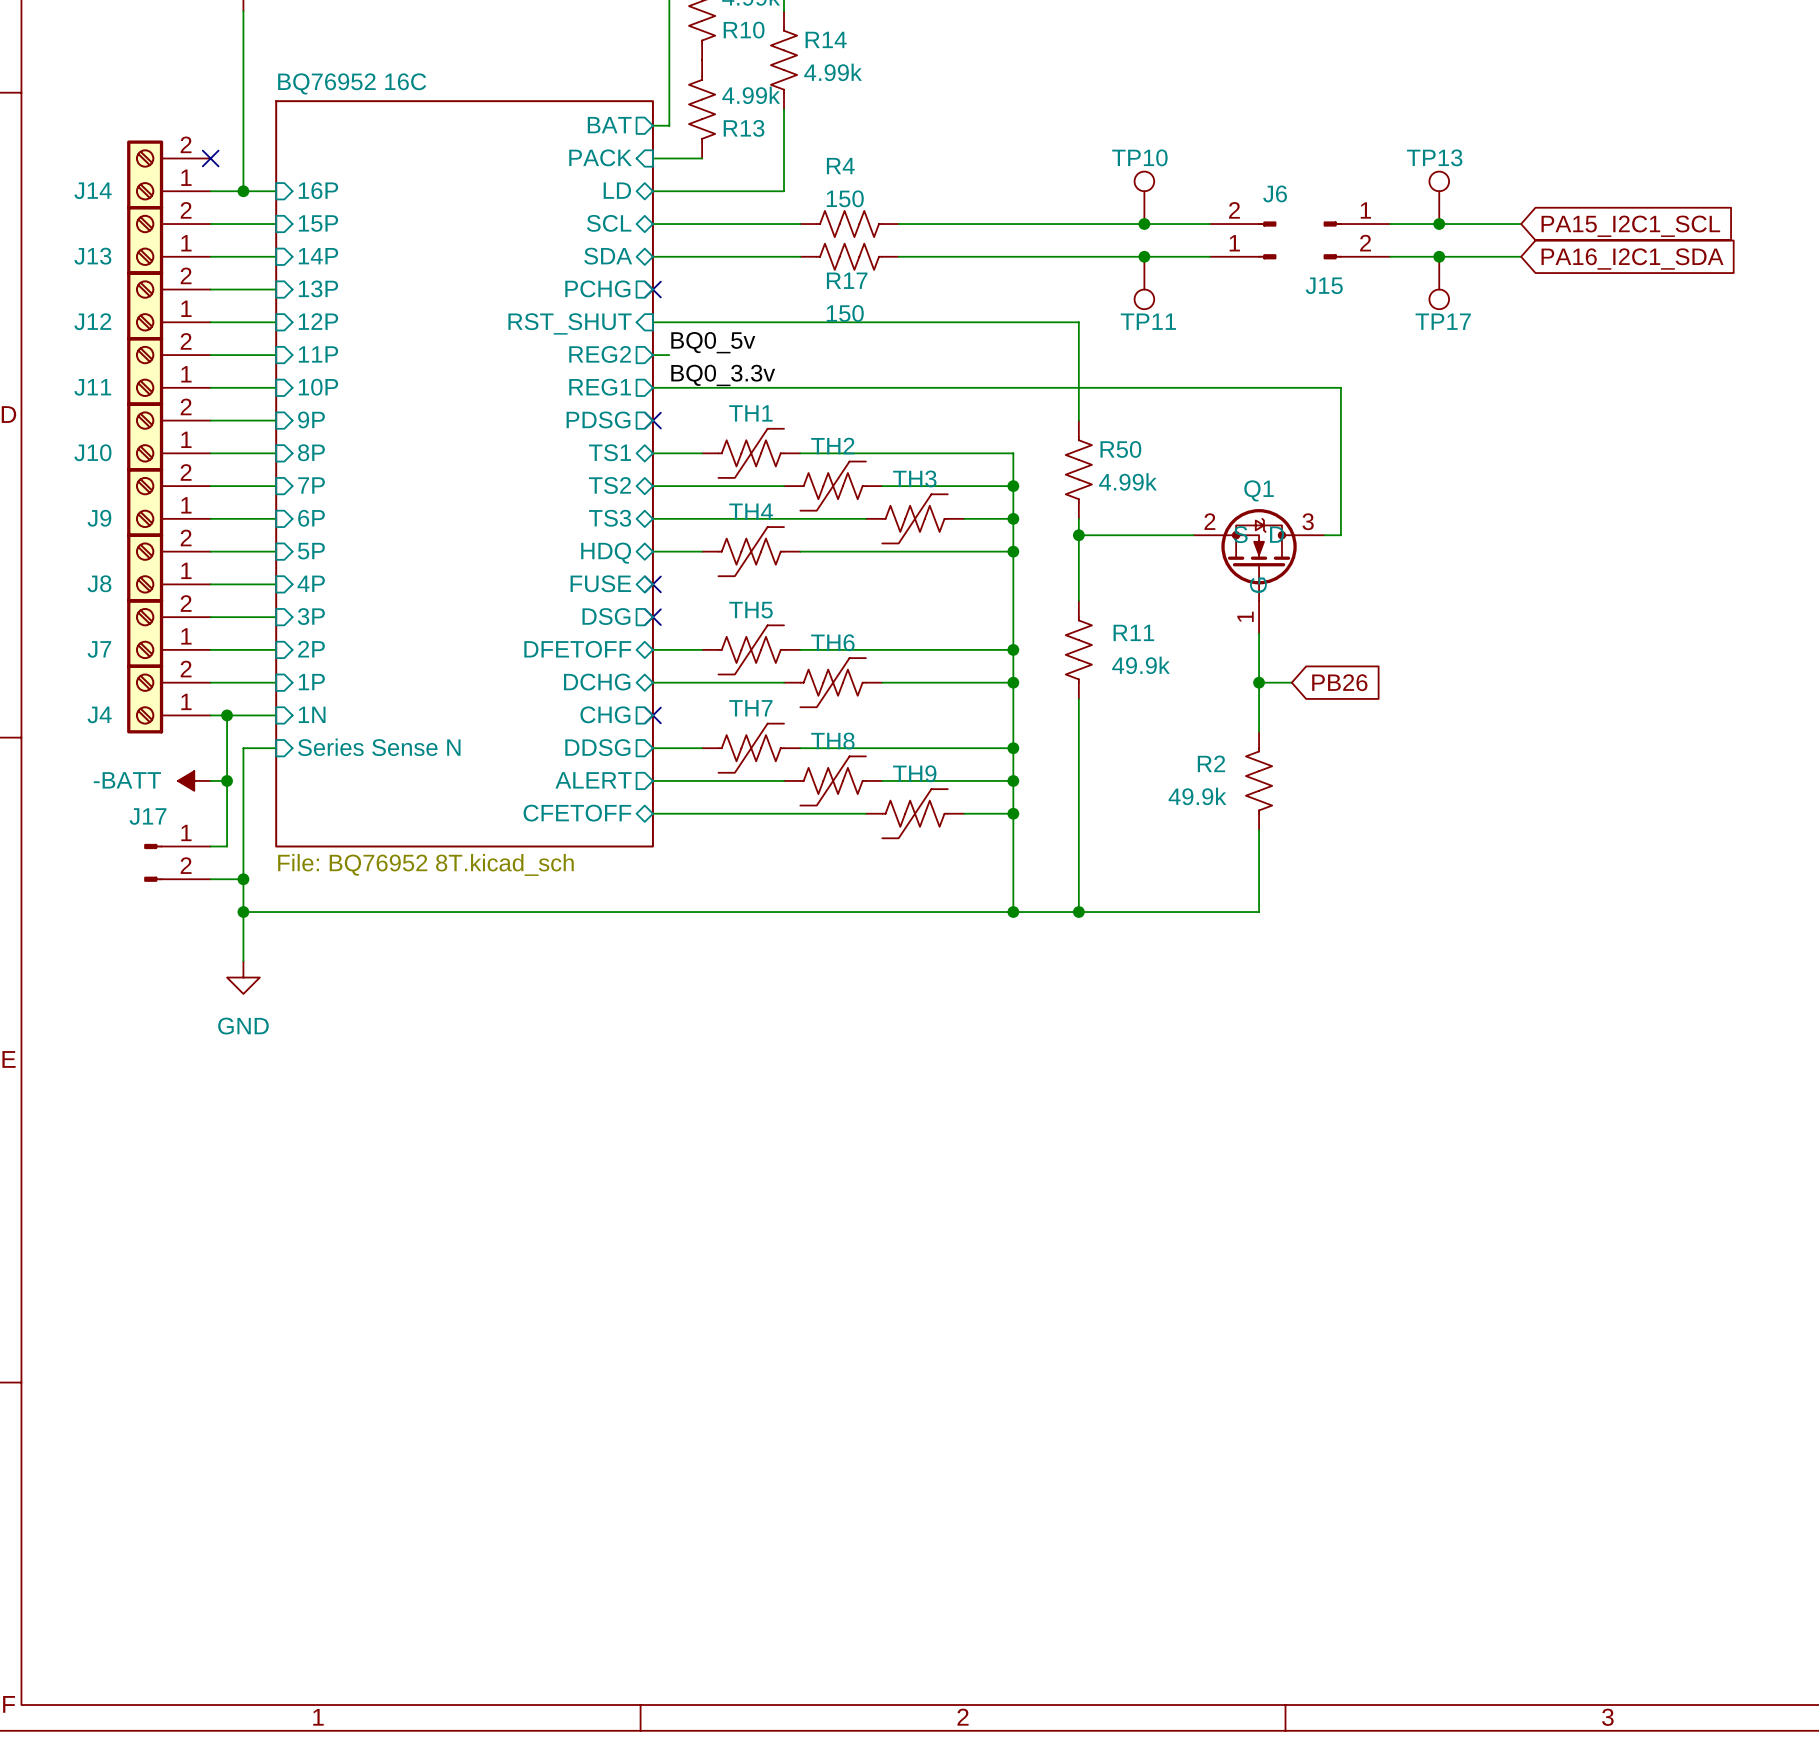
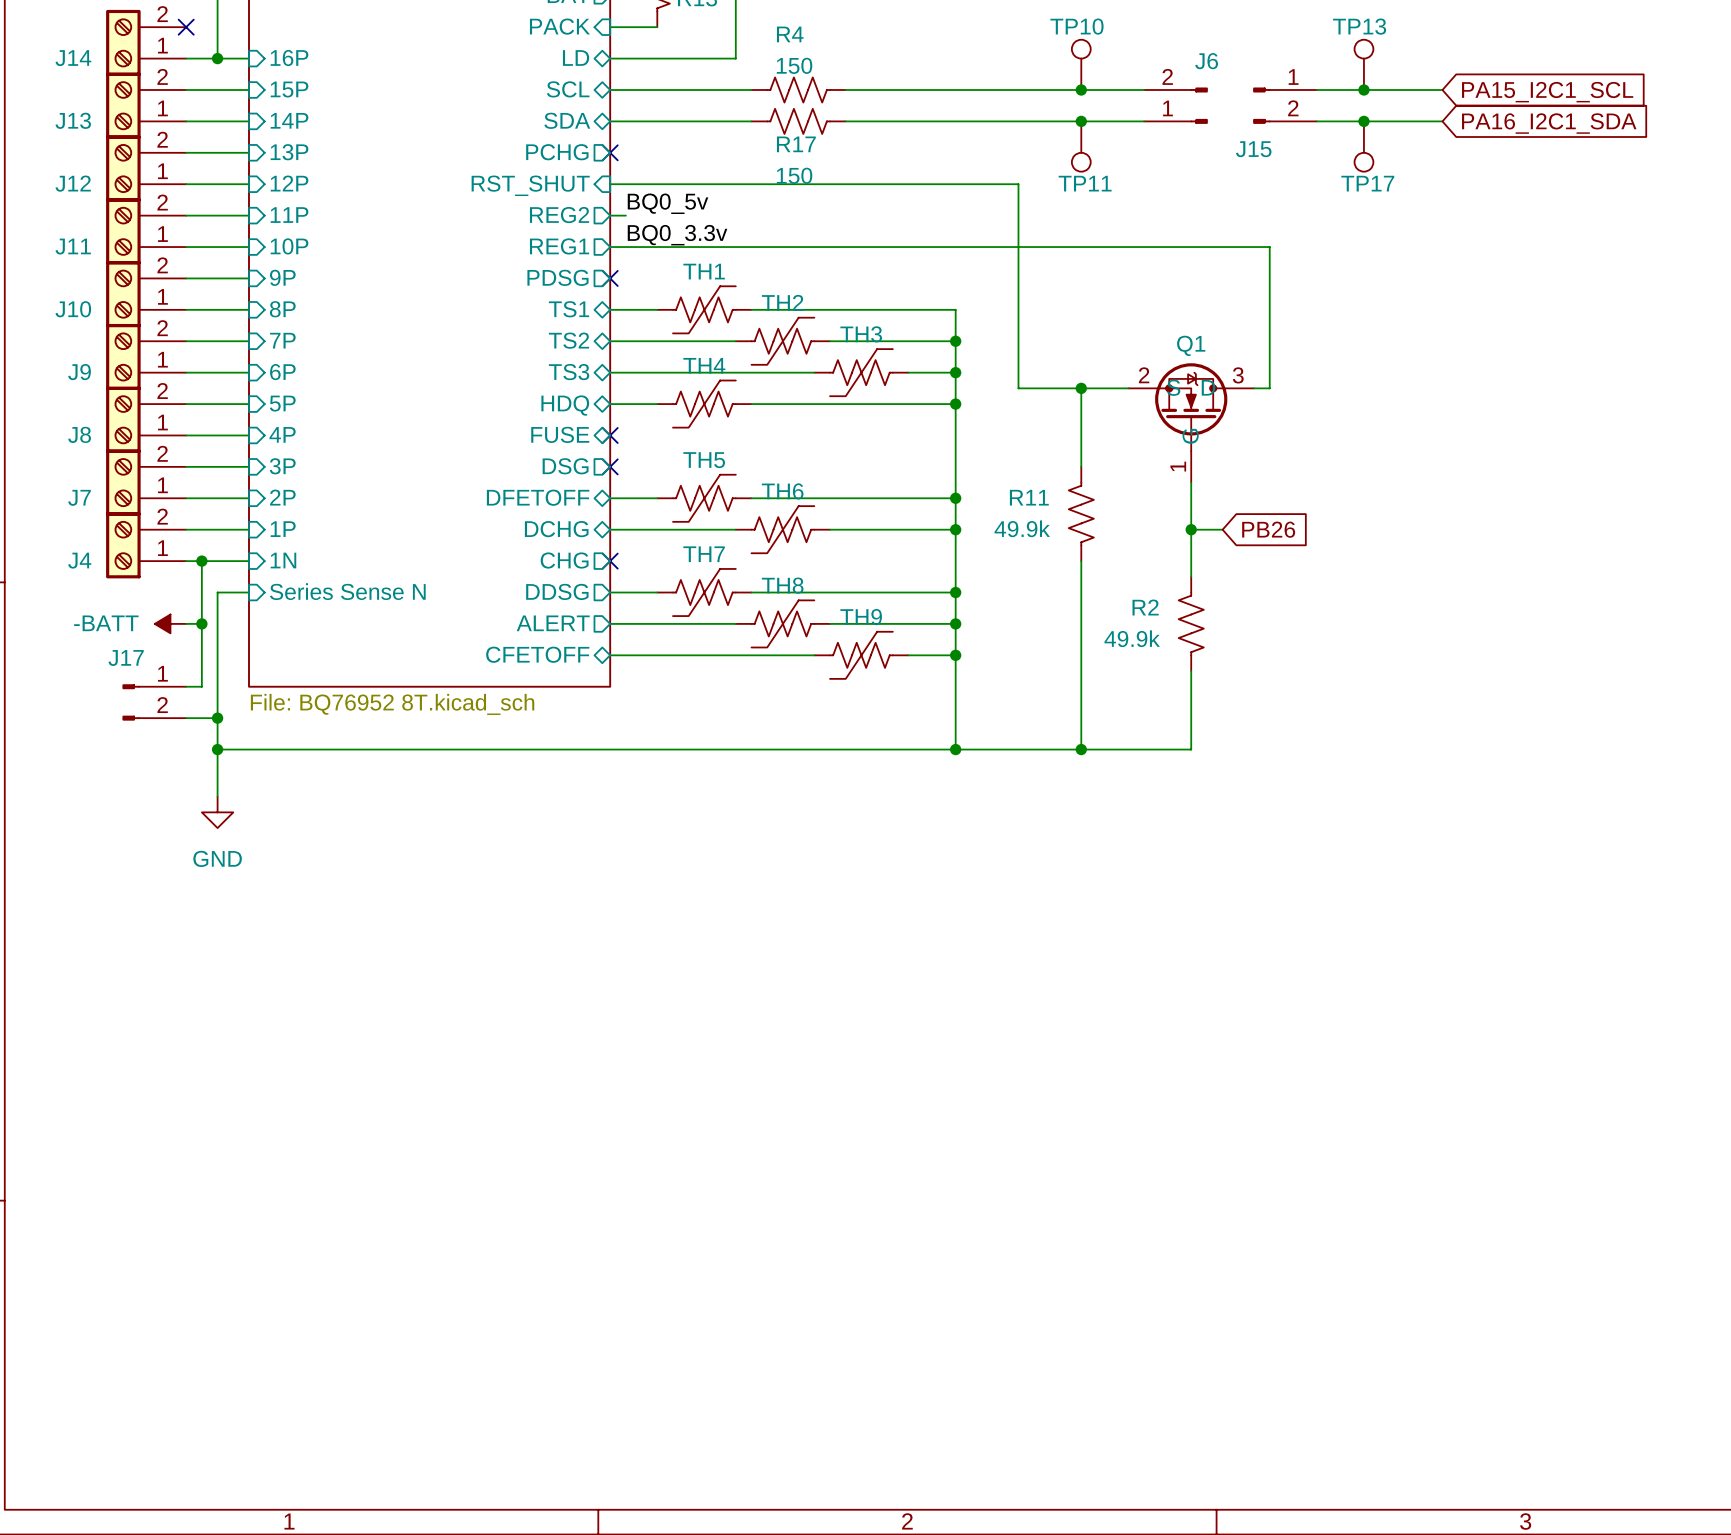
R50: 4.99k (1078, 469) -> none
wire: (1078, 535) (1078, 600) -> none
junction position: (1078, 535) -> (1081, 388)
wire: none -> (1081, 388) (1081, 466)
R11 flip: as is (1078, 649) -> left-right (1081, 513)
R11 position: (1078, 649) -> (1081, 513)
wire: (1078, 699) (1078, 912) -> none
wire: none -> (1081, 561) (1081, 749)
junction position: (1078, 912) -> (1081, 749)

